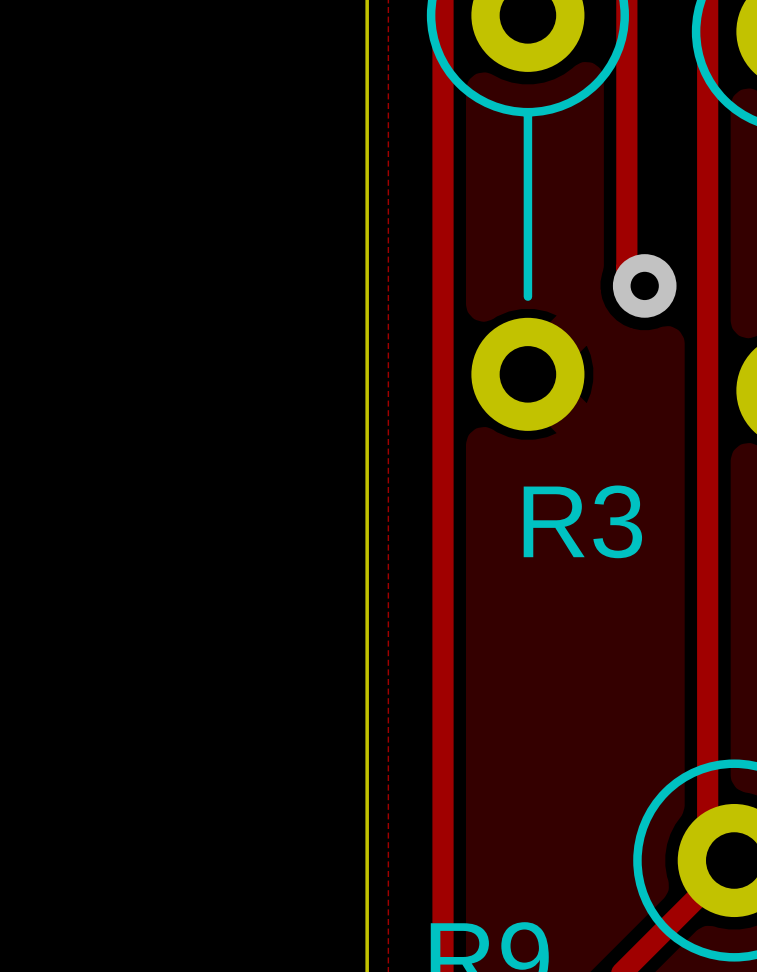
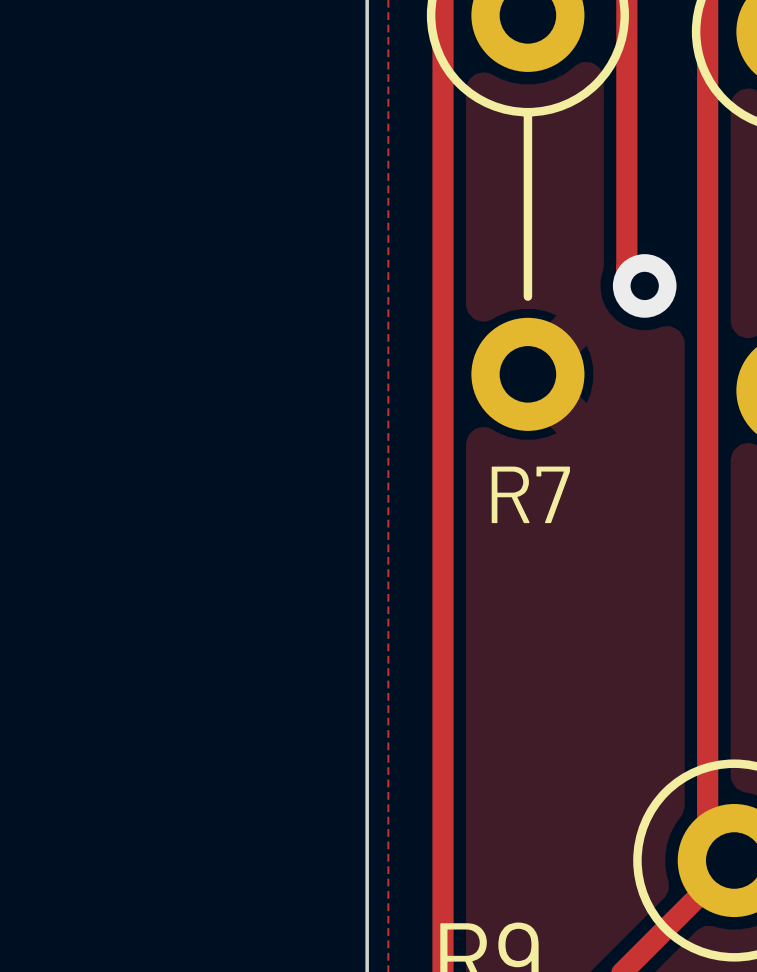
R7 name: none -> R7 (530, 494)
R3 name: R3 (582, 521) -> none

